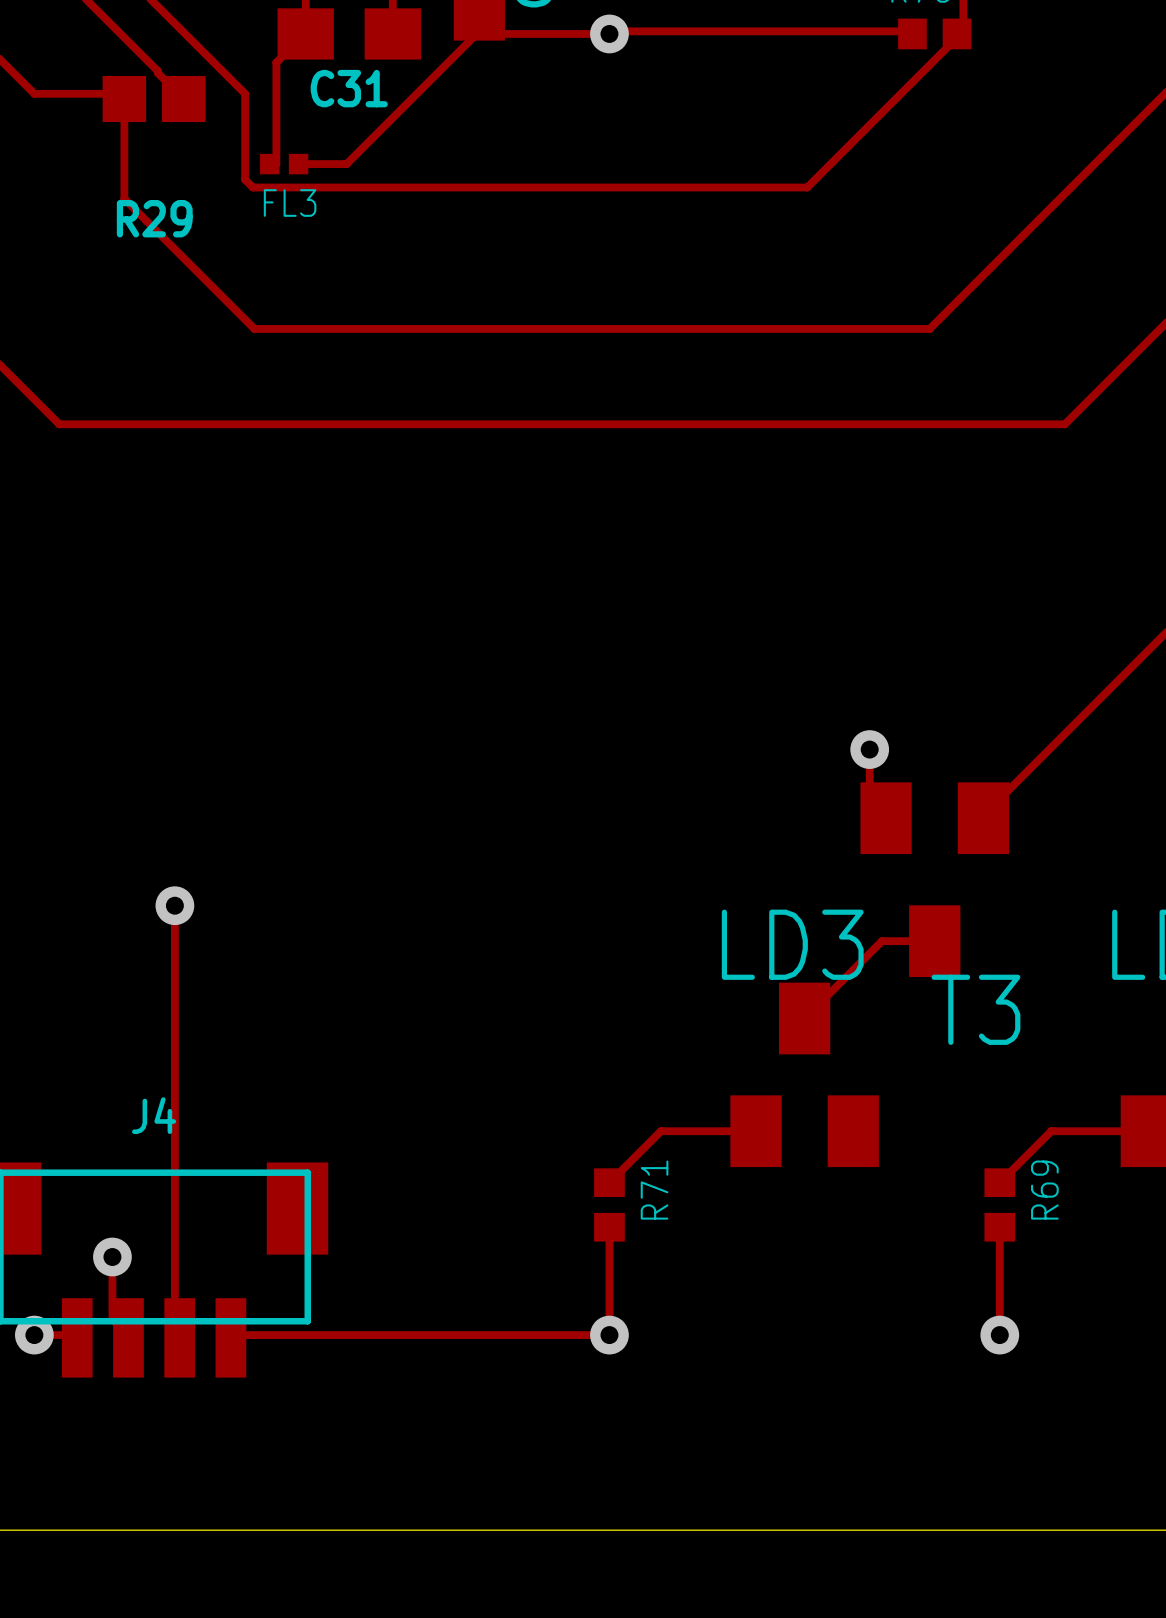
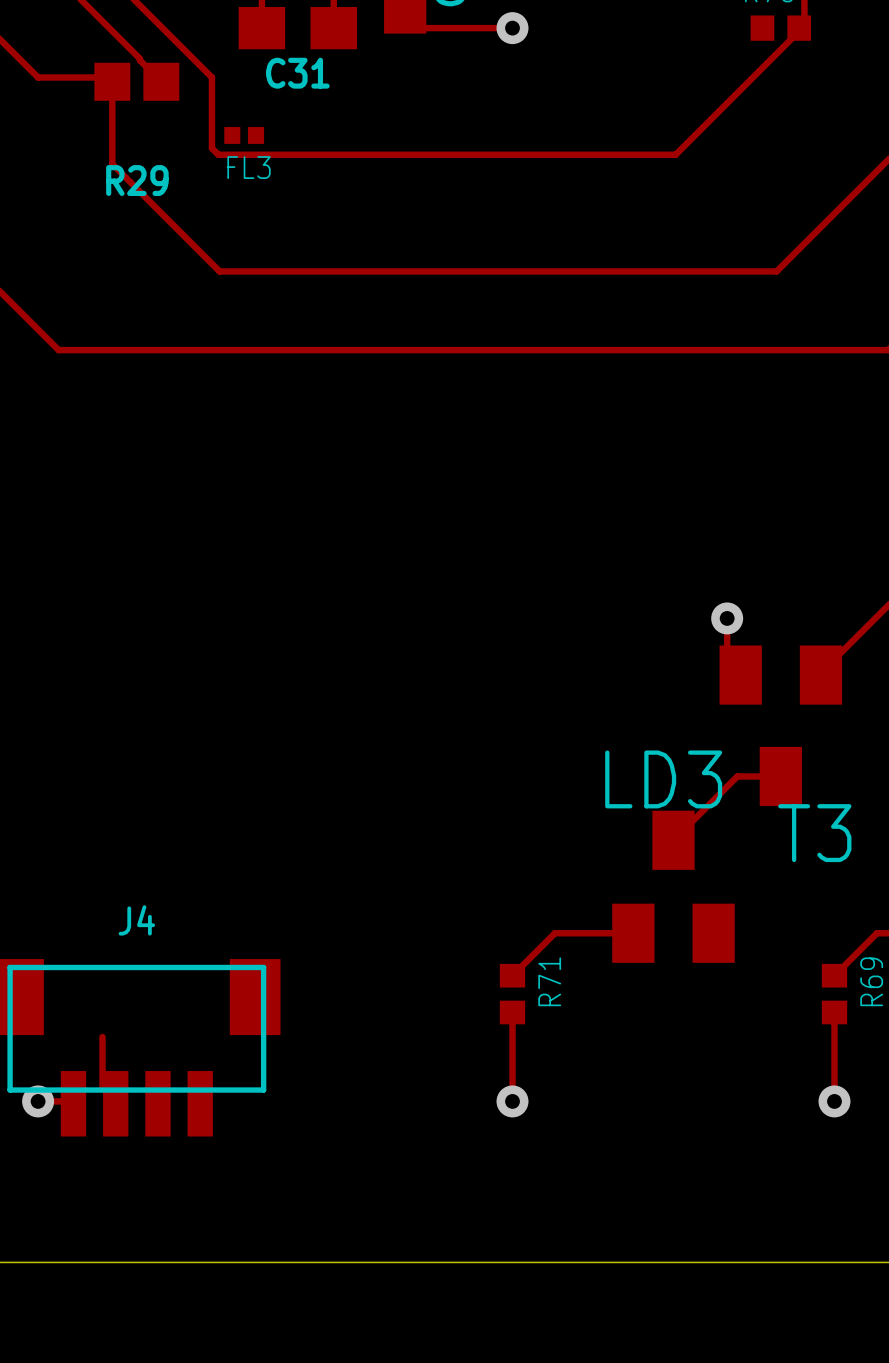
track: (479, 12) (487, 23) (346, 164) (298, 164) -> none
track: (305, 33) (276, 62) (276, 164) (269, 164) -> none
track: (609, 33) (612, 31) (908, 31) (912, 33) -> none
track: (174, 905) (174, 1335) (179, 1337) -> none
via: (174, 905) -> none
via: (112, 1257) -> none
track: (609, 1335) (237, 1335) (230, 1337) -> none

